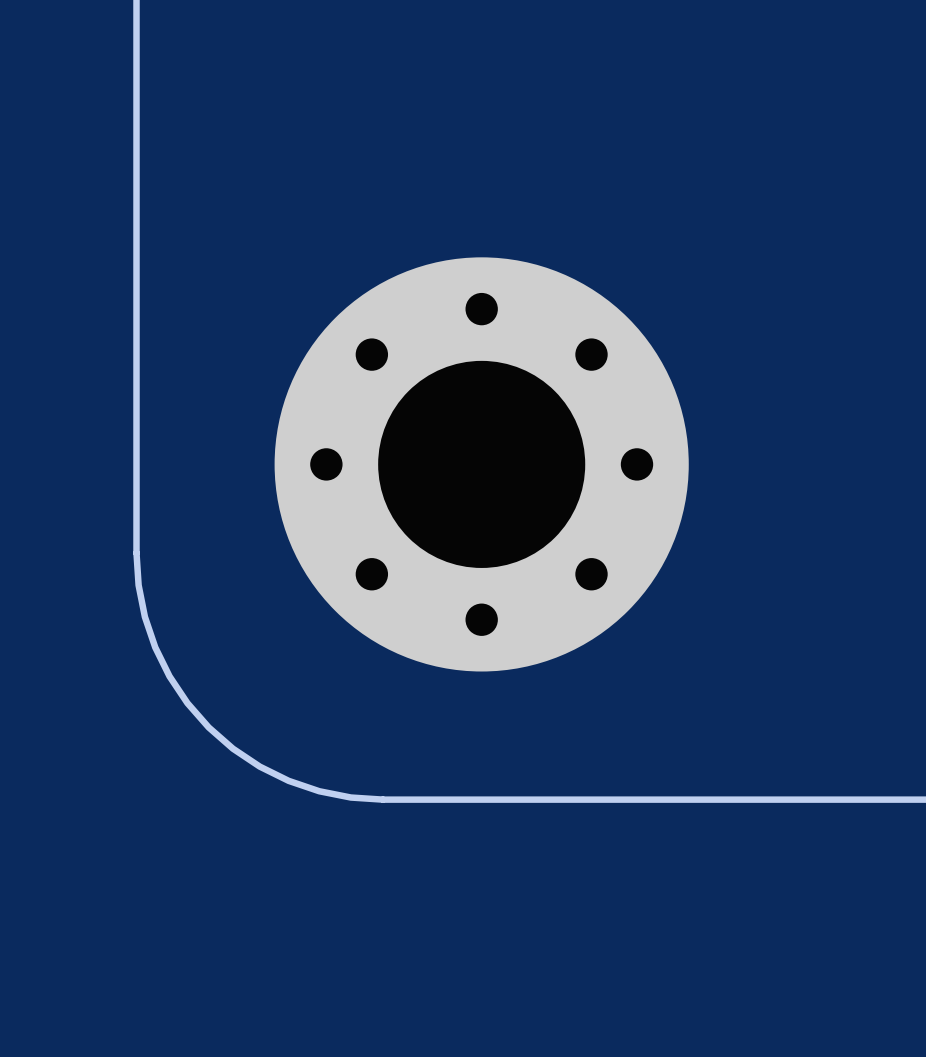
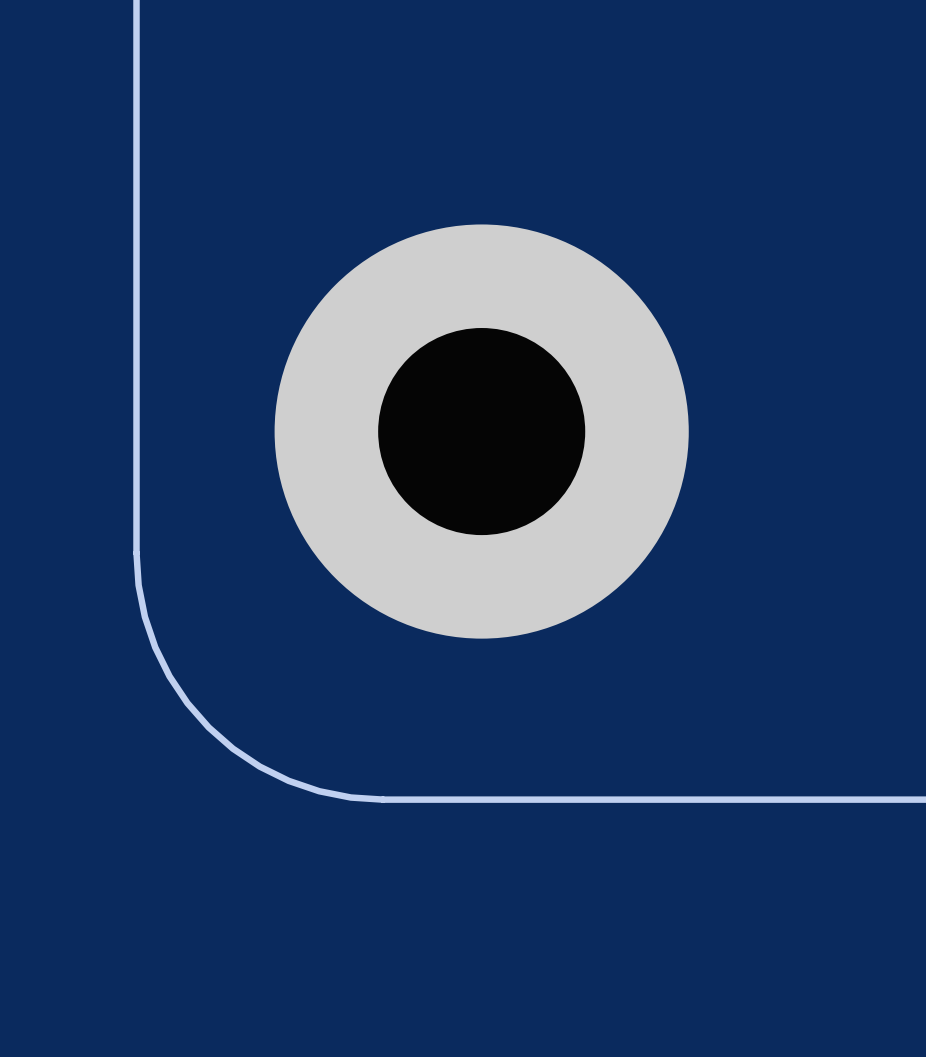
part footprint: [274, 257, 689, 672] -> [274, 224, 689, 639]

